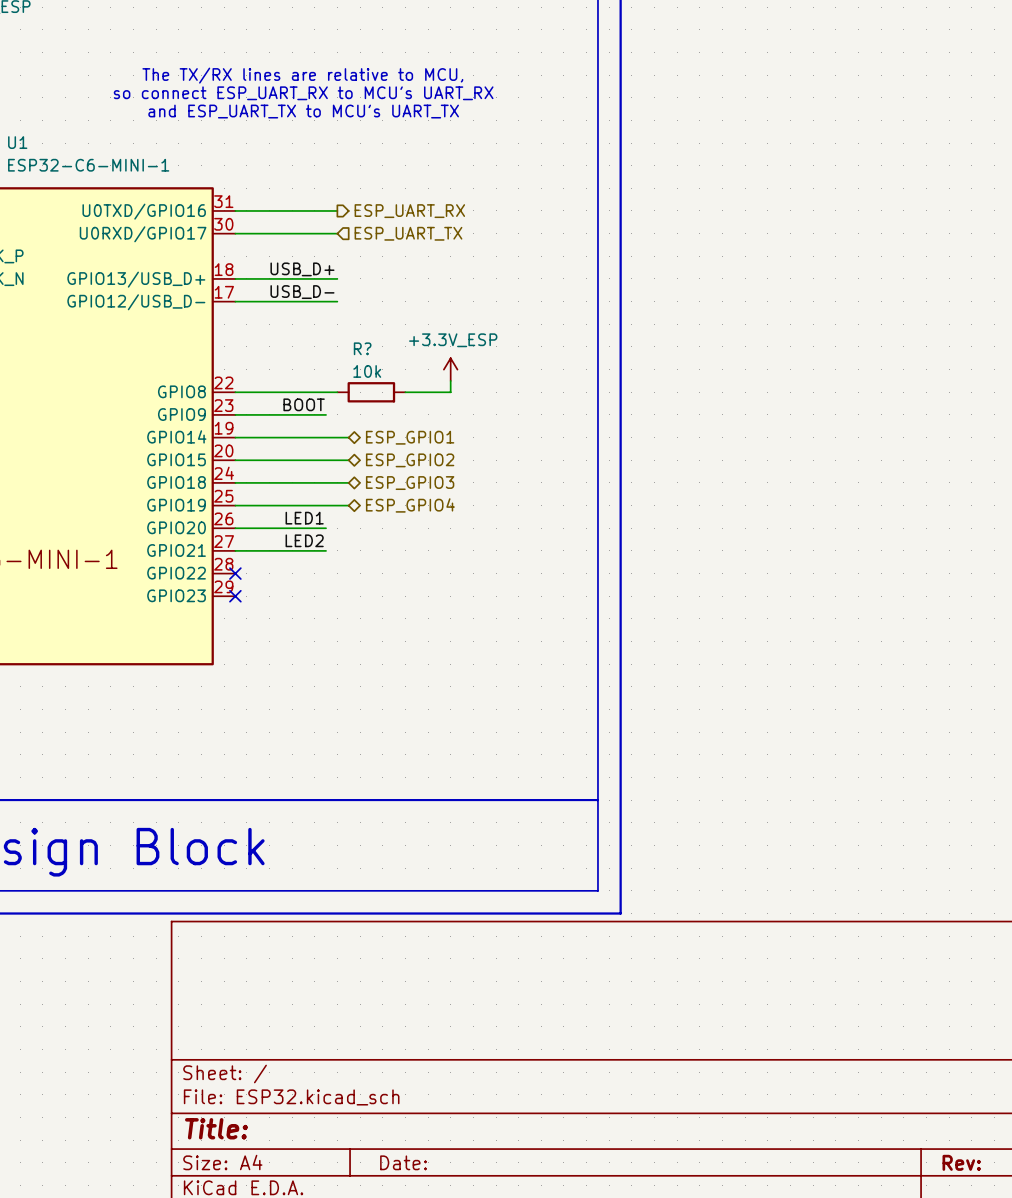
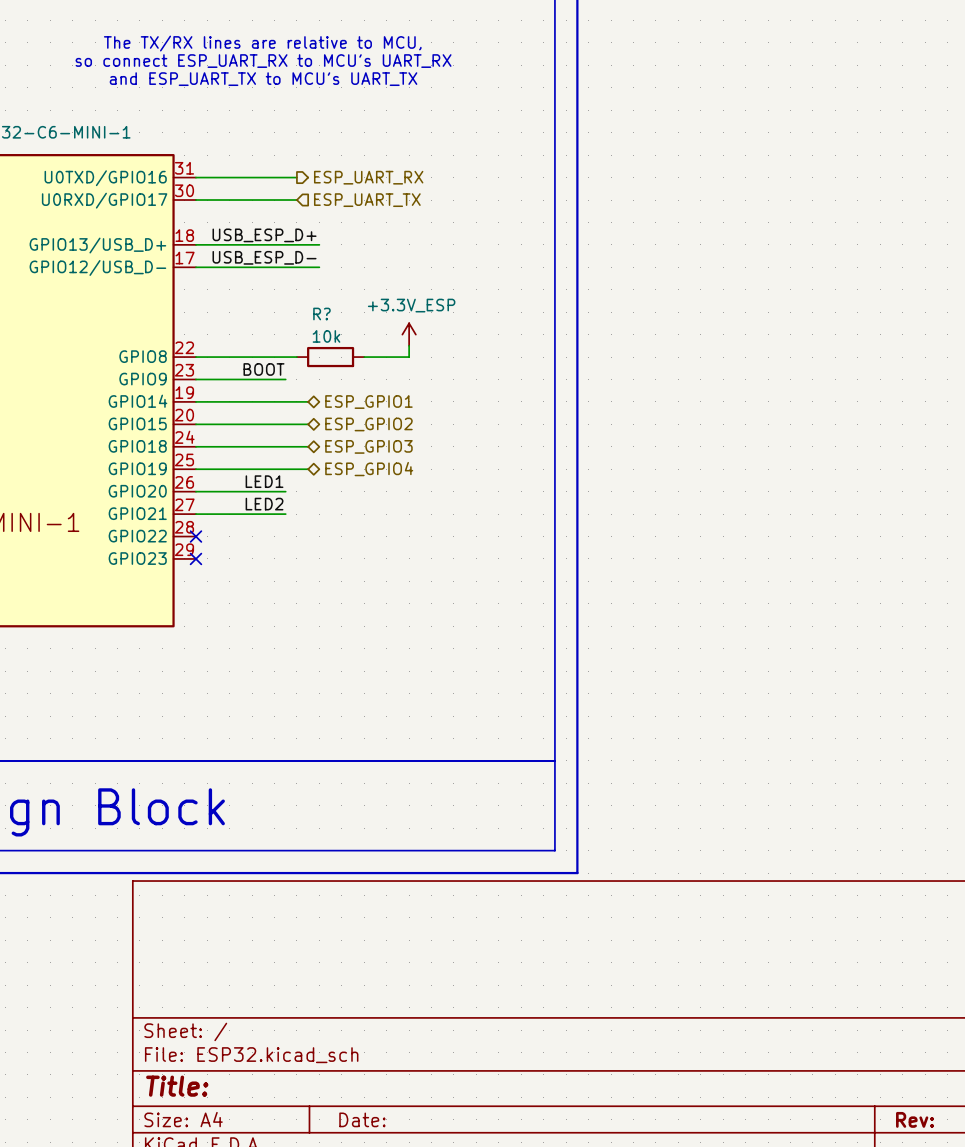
label: USB_D+ (302, 269) -> none
label: none -> USB_ESP_D+ (264, 235)
wire: none -> (296, 244) (319, 244)
label: USB_D- (302, 292) -> none
label: none -> USB_ESP_D- (264, 257)
wire: none -> (296, 267) (319, 267)

